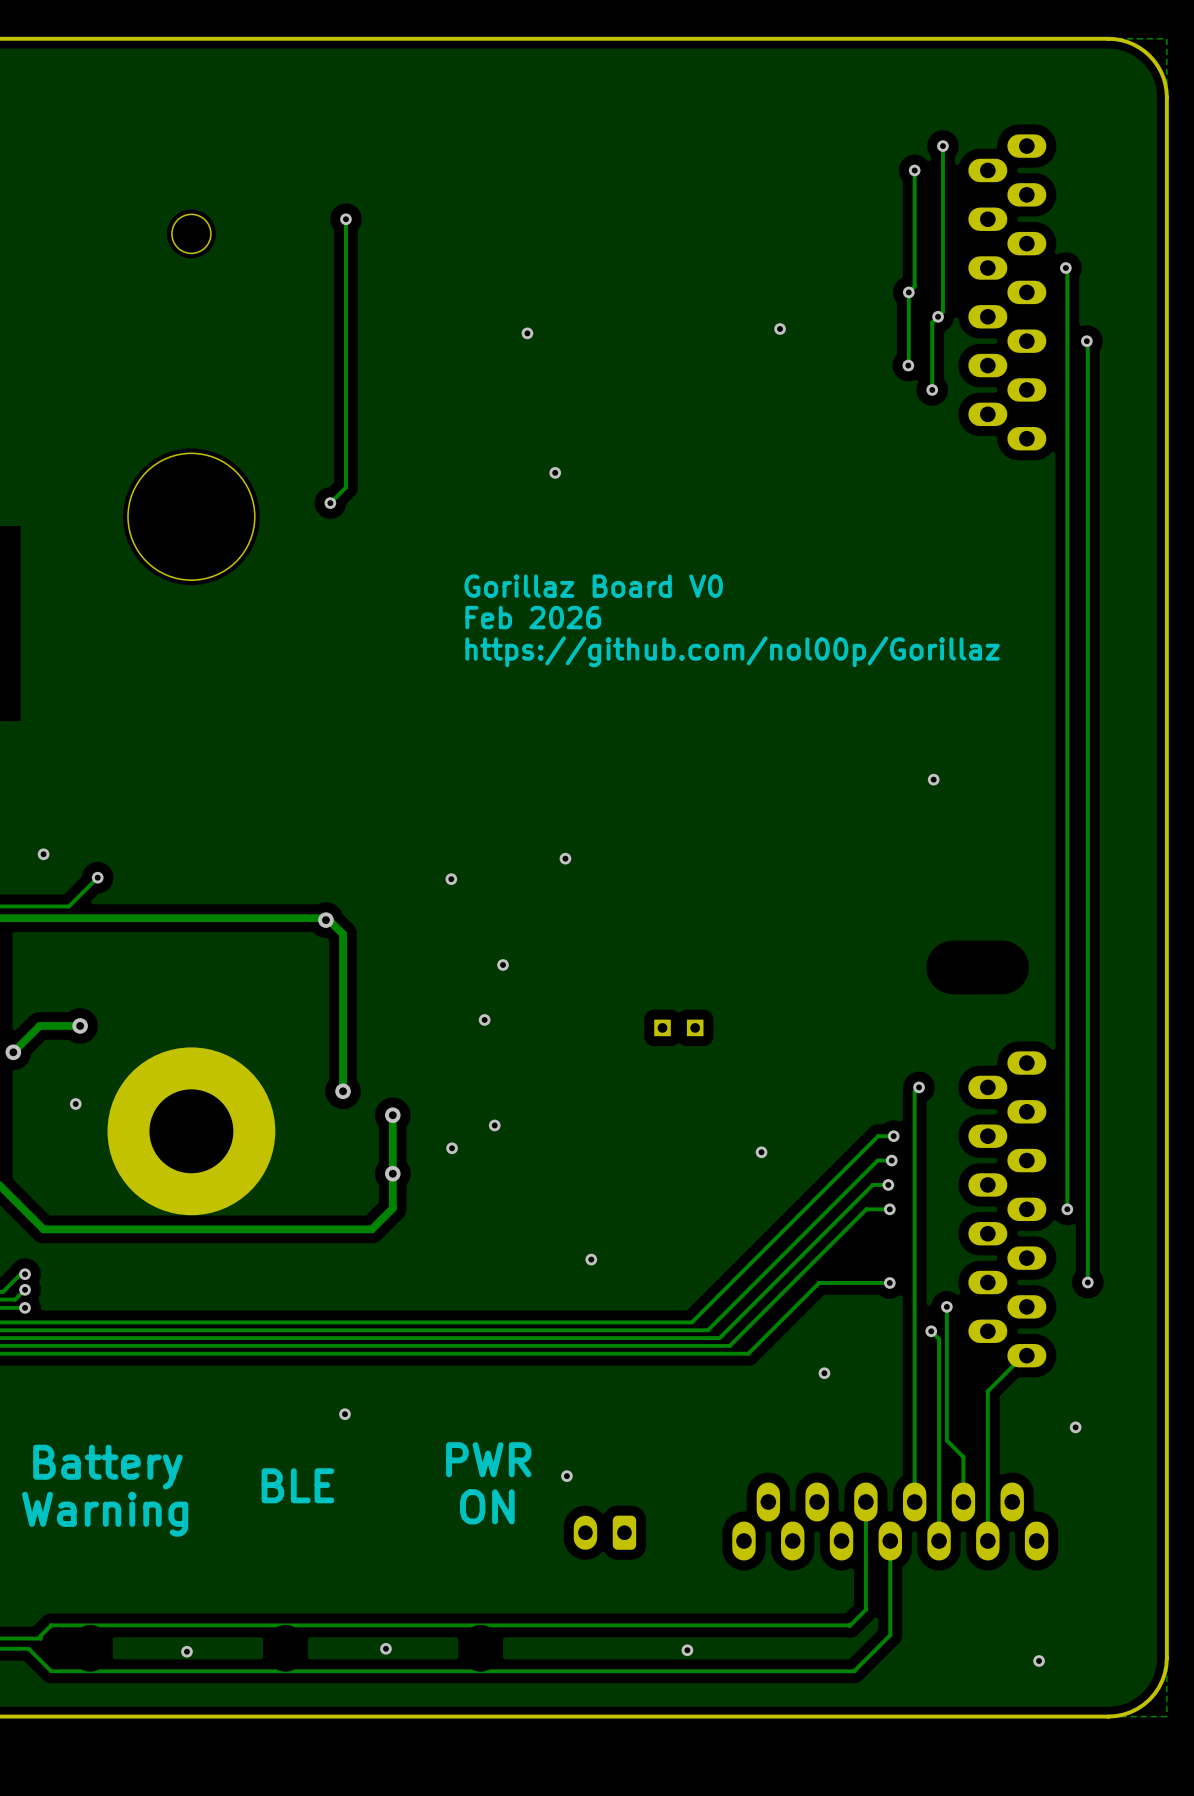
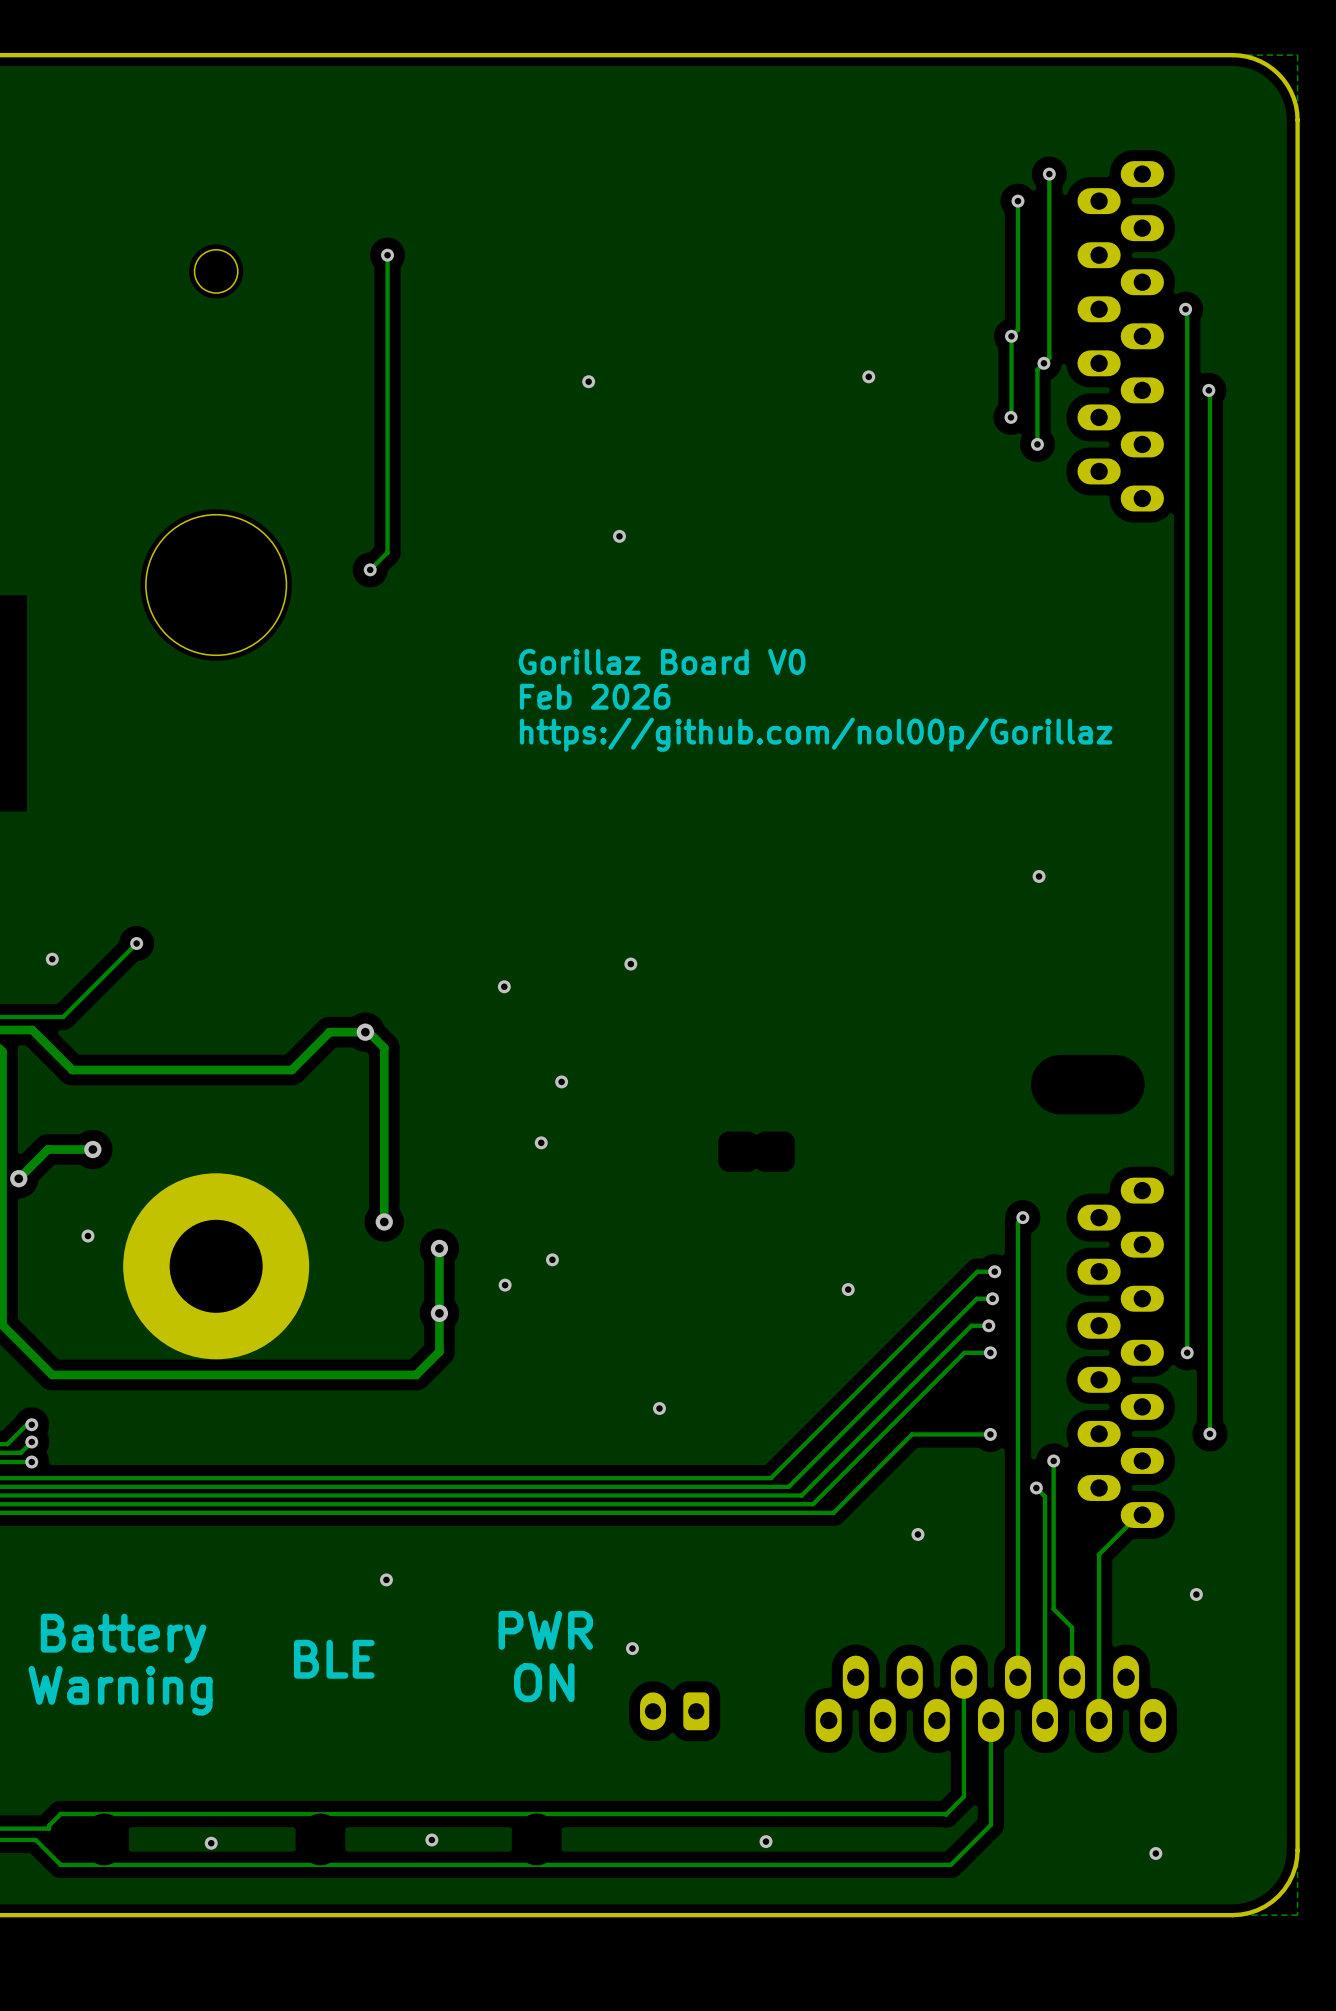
track: (97, 877) (68, 906) (53, 906) -> (136, 943) (63, 1017)
via position: (97, 877) -> (136, 943)
track: (326, 918) (25, 918) -> (365, 1032) (329, 1032) (291, 1070) (72, 1070) (32, 1030)
part: (662, 1027) -> none
part: (695, 1027) -> none

